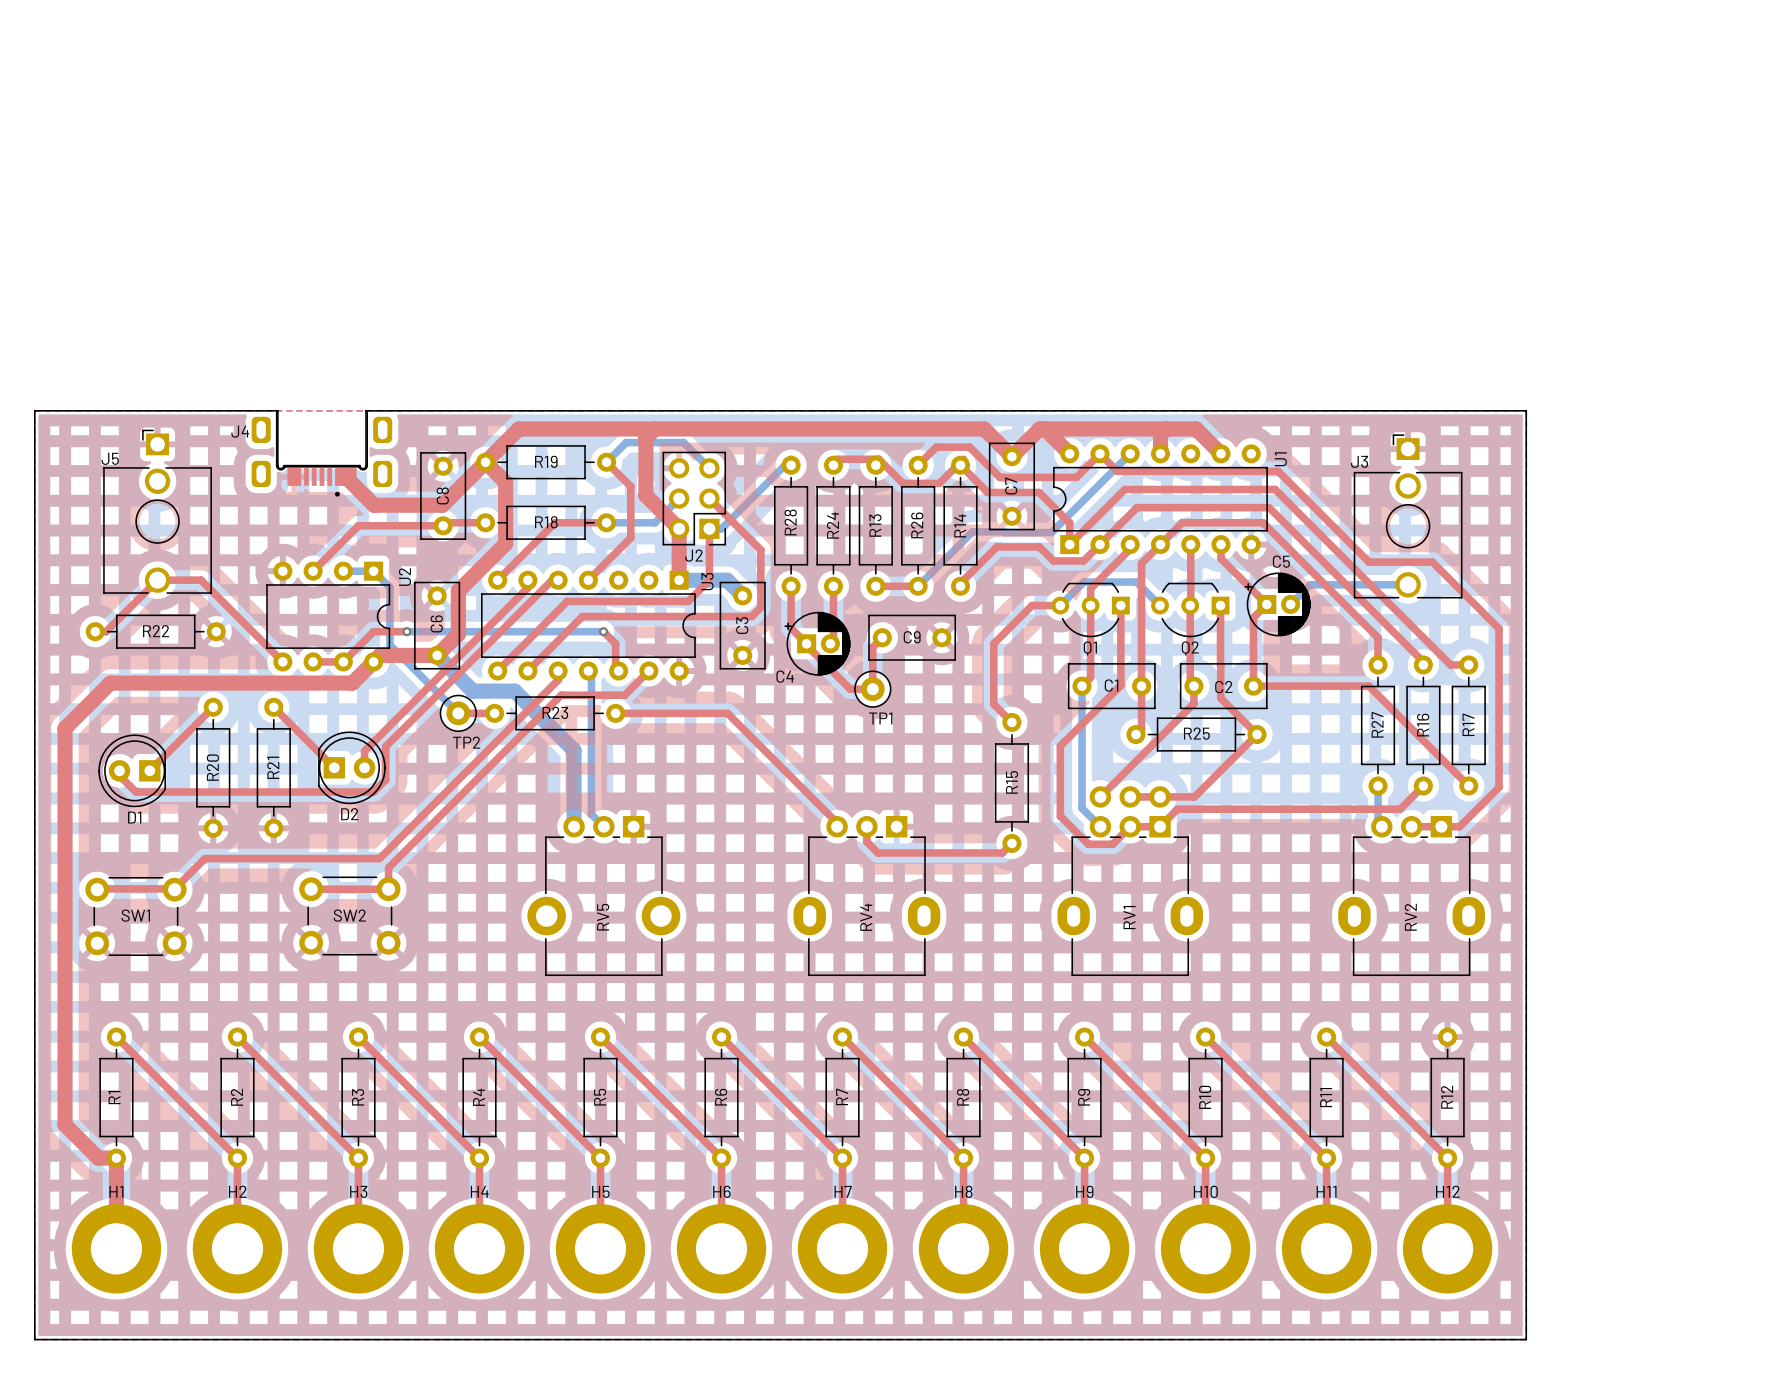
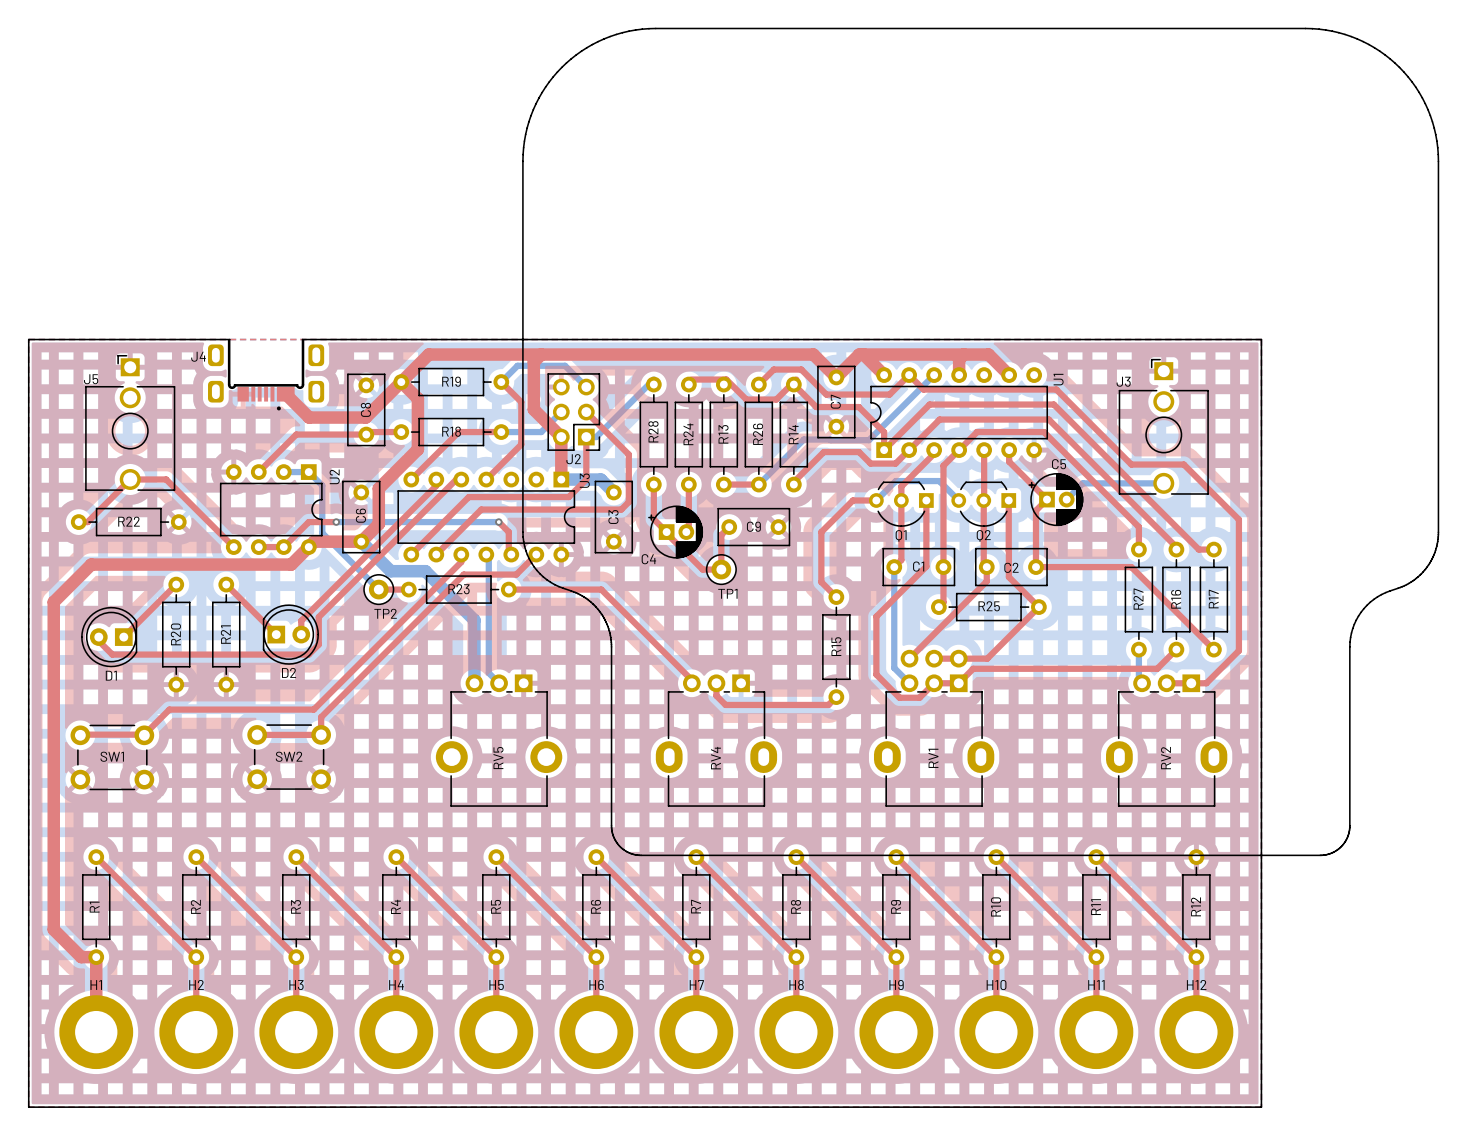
board edge: none -> (655, 28) (635, 30) (610, 36) (586, 47) (566, 63) (549, 81) (536, 103) (527, 128) (523, 154) (523, 541) (529, 559) (539, 573) (554, 584) (577, 593) (589, 600) (601, 614) (608, 628) (611, 646) (611, 827) (618, 844) (628, 852) (641, 855) (1320, 855) (1330, 853) (1339, 848) (1346, 838) (1349, 827) (1349, 646) (1352, 628) (1358, 616) (1370, 602) (1381, 594) (1408, 583) (1422, 572) (1433, 554) (1438, 536) (1438, 154) (1430, 115) (1422, 98) (1408, 76) (1385, 54) (1363, 41) (1338, 32) (1312, 28) (655, 28)

